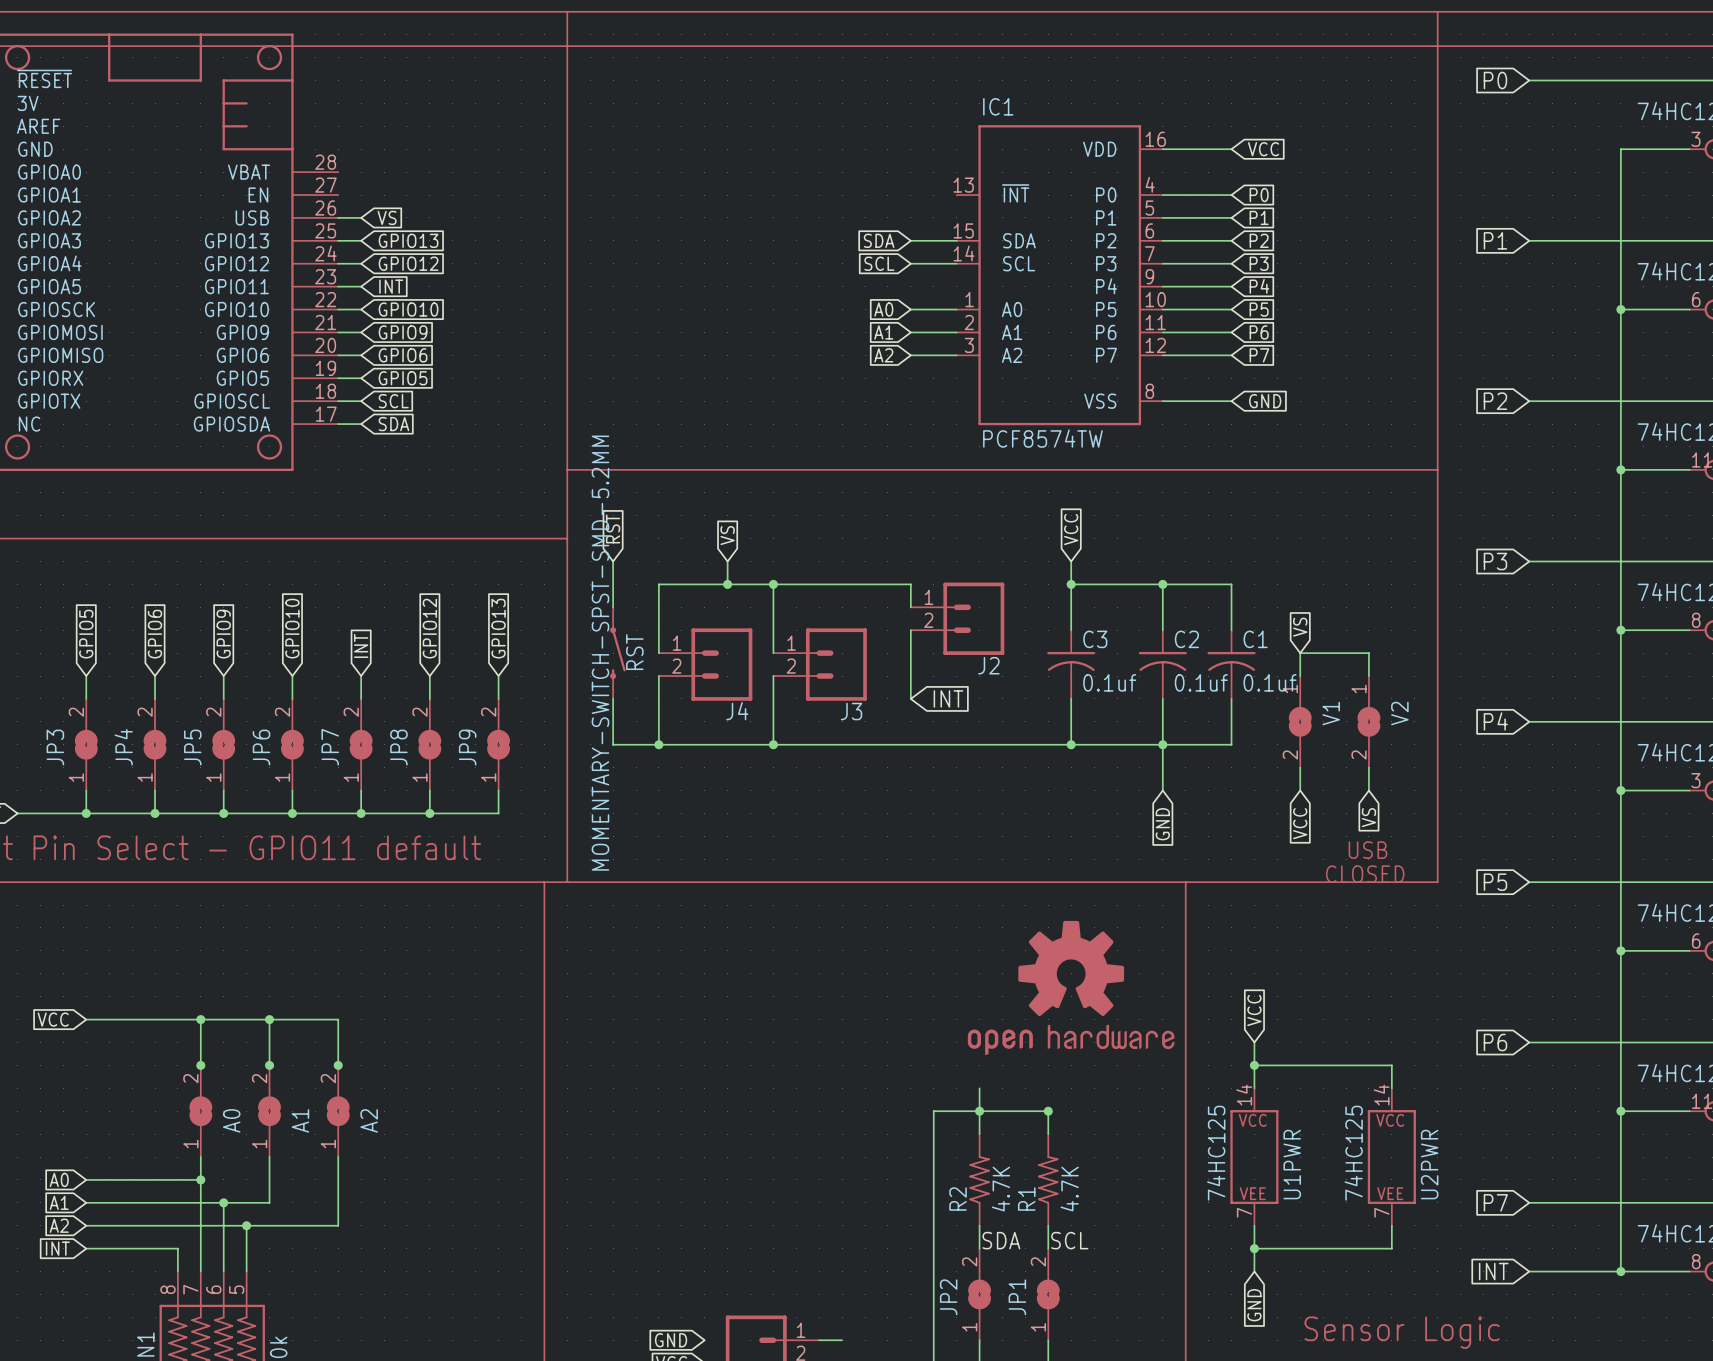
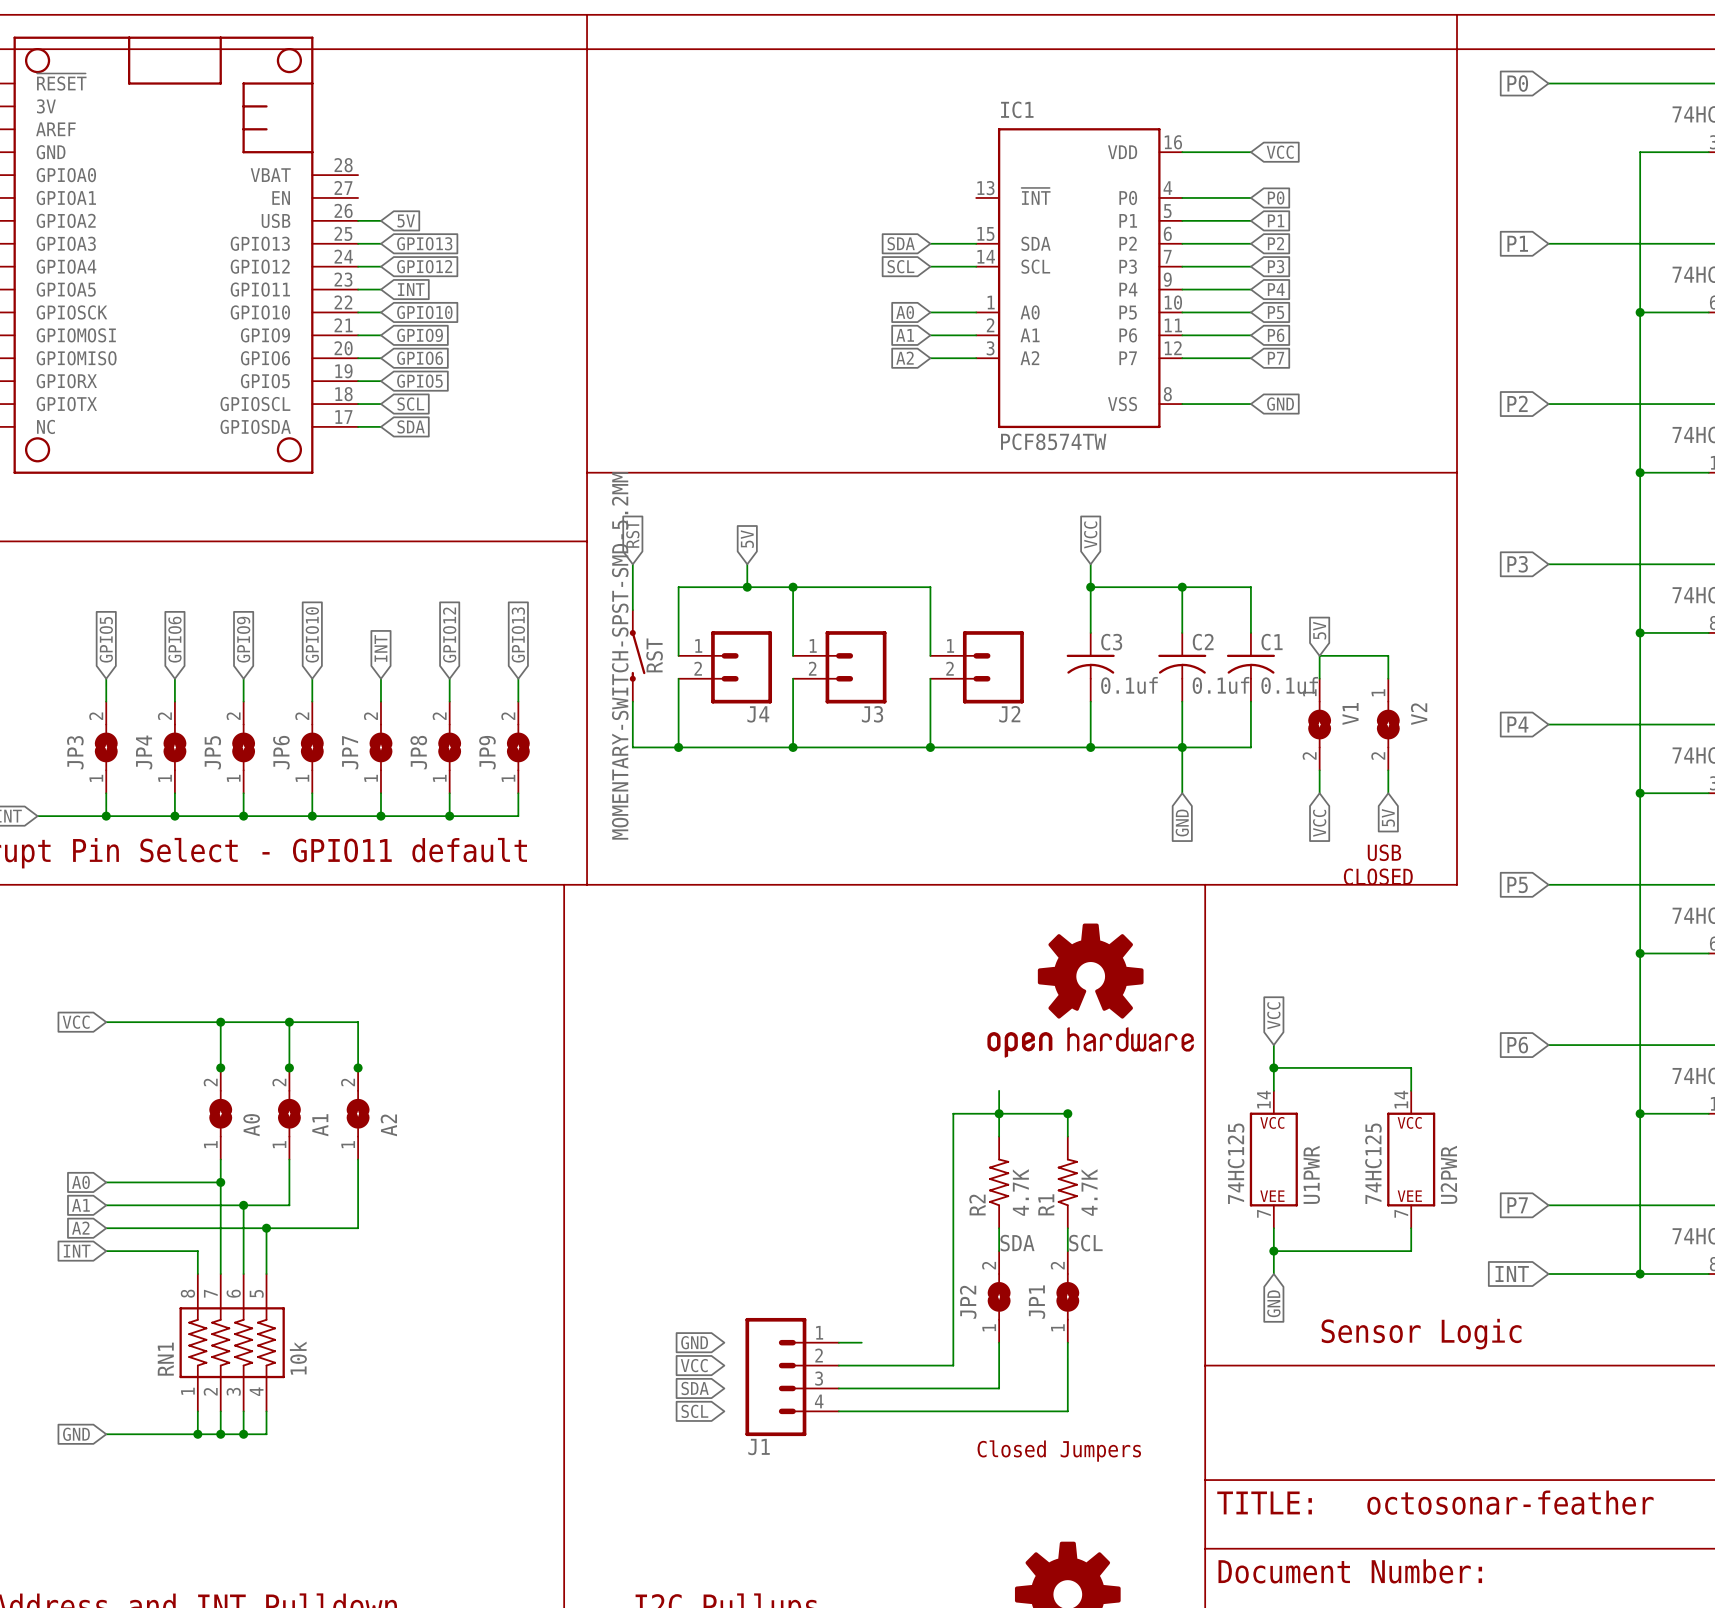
global label: VS (387, 217) -> 5V (406, 221)
global label: VS (727, 535) -> 5V (747, 539)
J2 position: (957, 618) -> (977, 667)
global label: VS (1300, 627) -> 5V (1319, 630)
wire: (910, 653) (910, 676) -> (930, 610) (930, 632)
wire: none -> (930, 701) (930, 747)
global label: INT (948, 698) -> none
junction: none -> (930, 747)
global label: VS (1368, 817) -> 5V (1388, 817)

